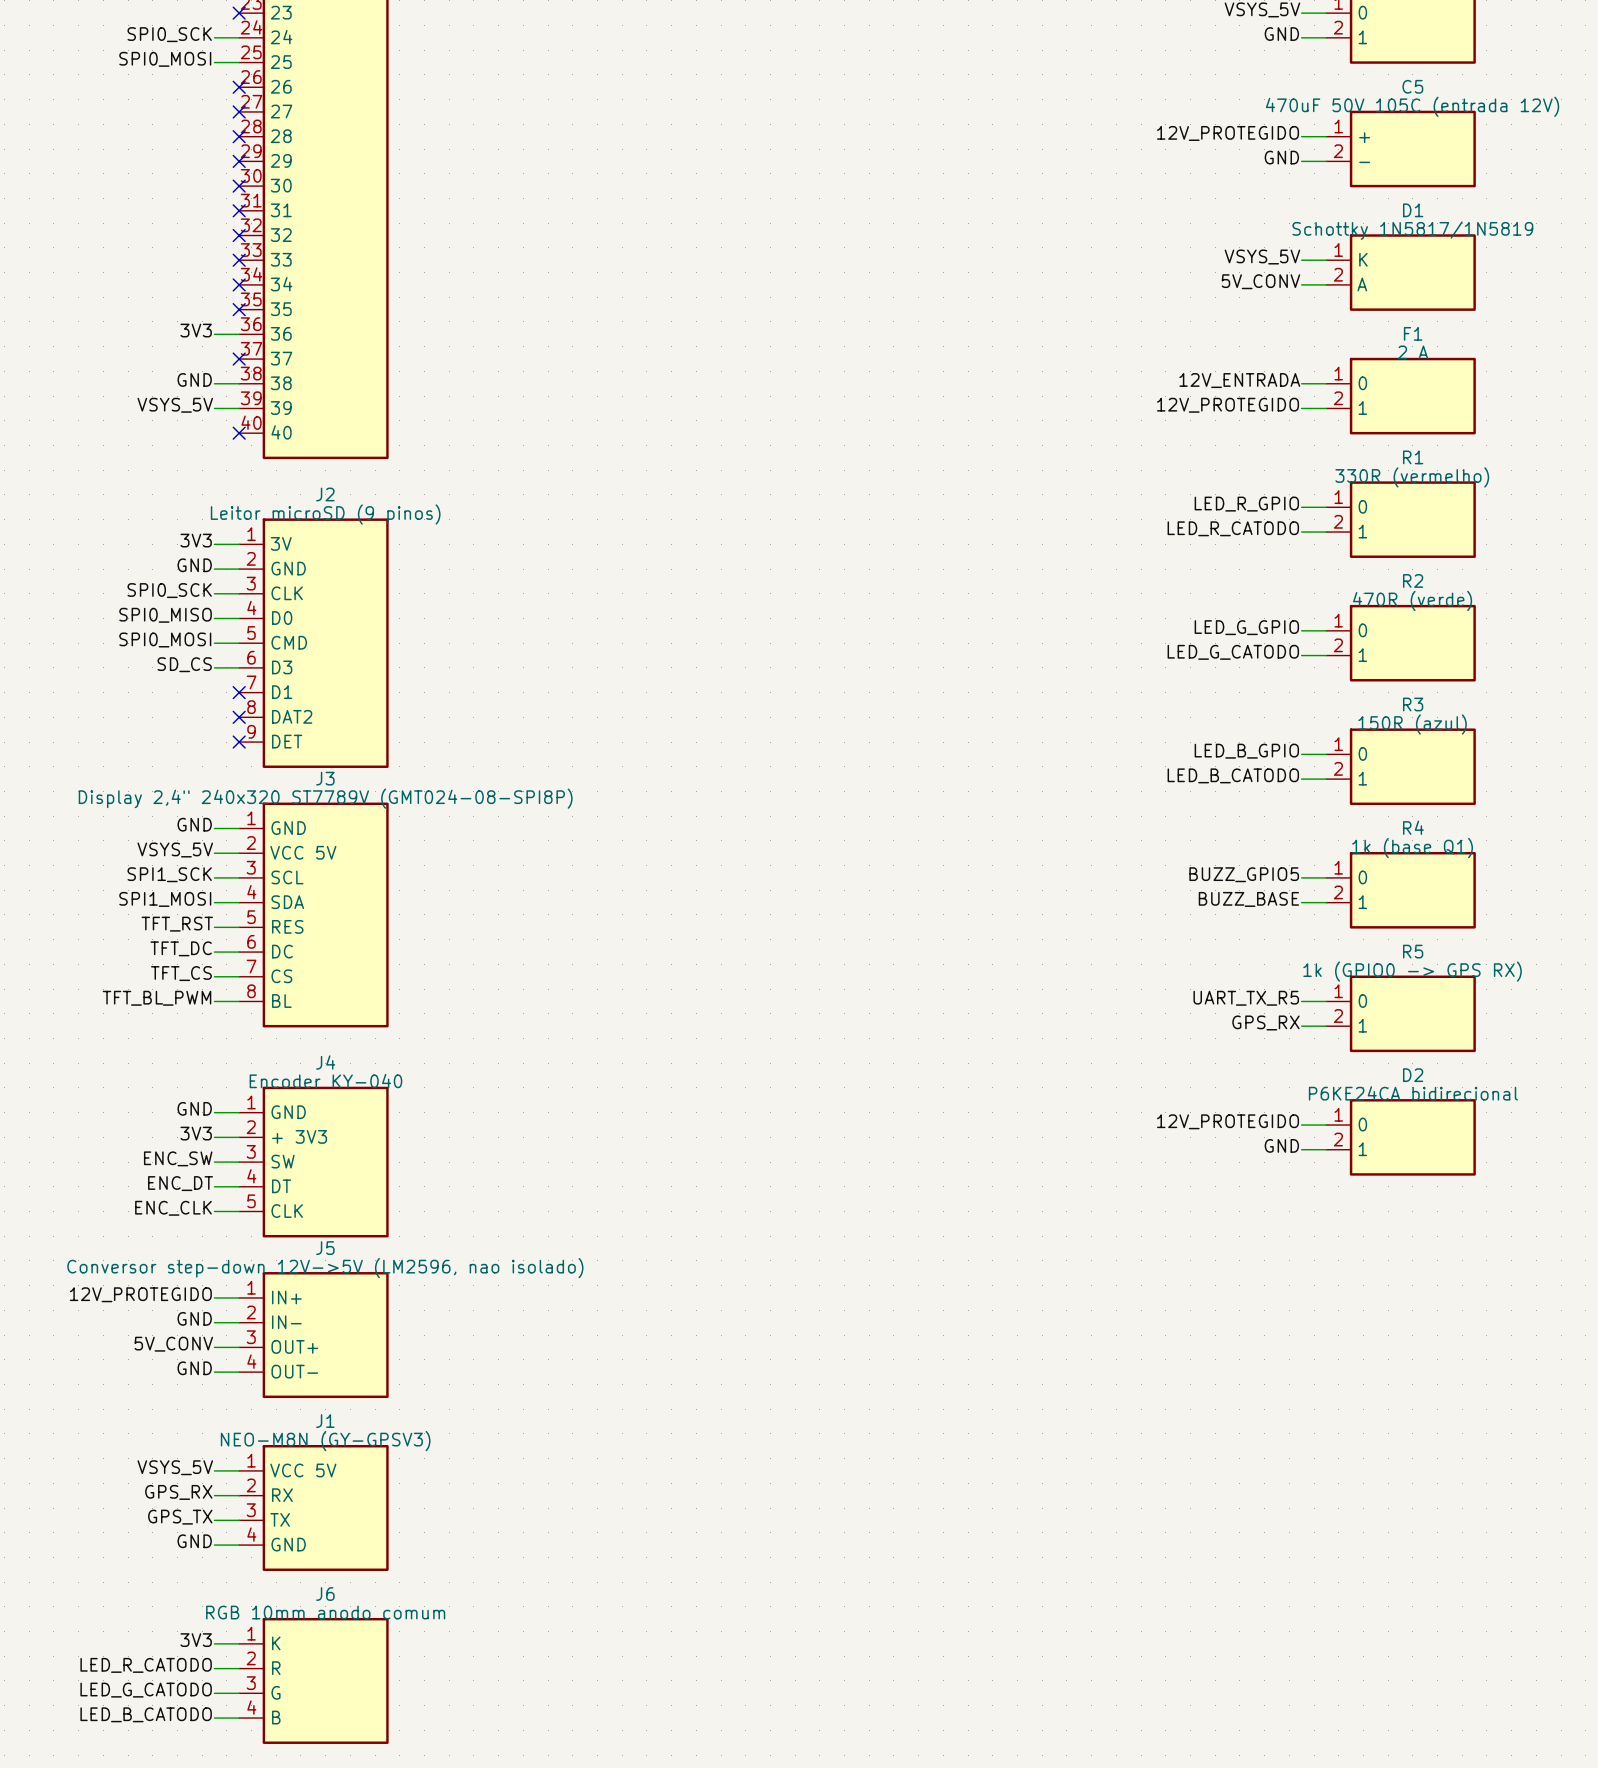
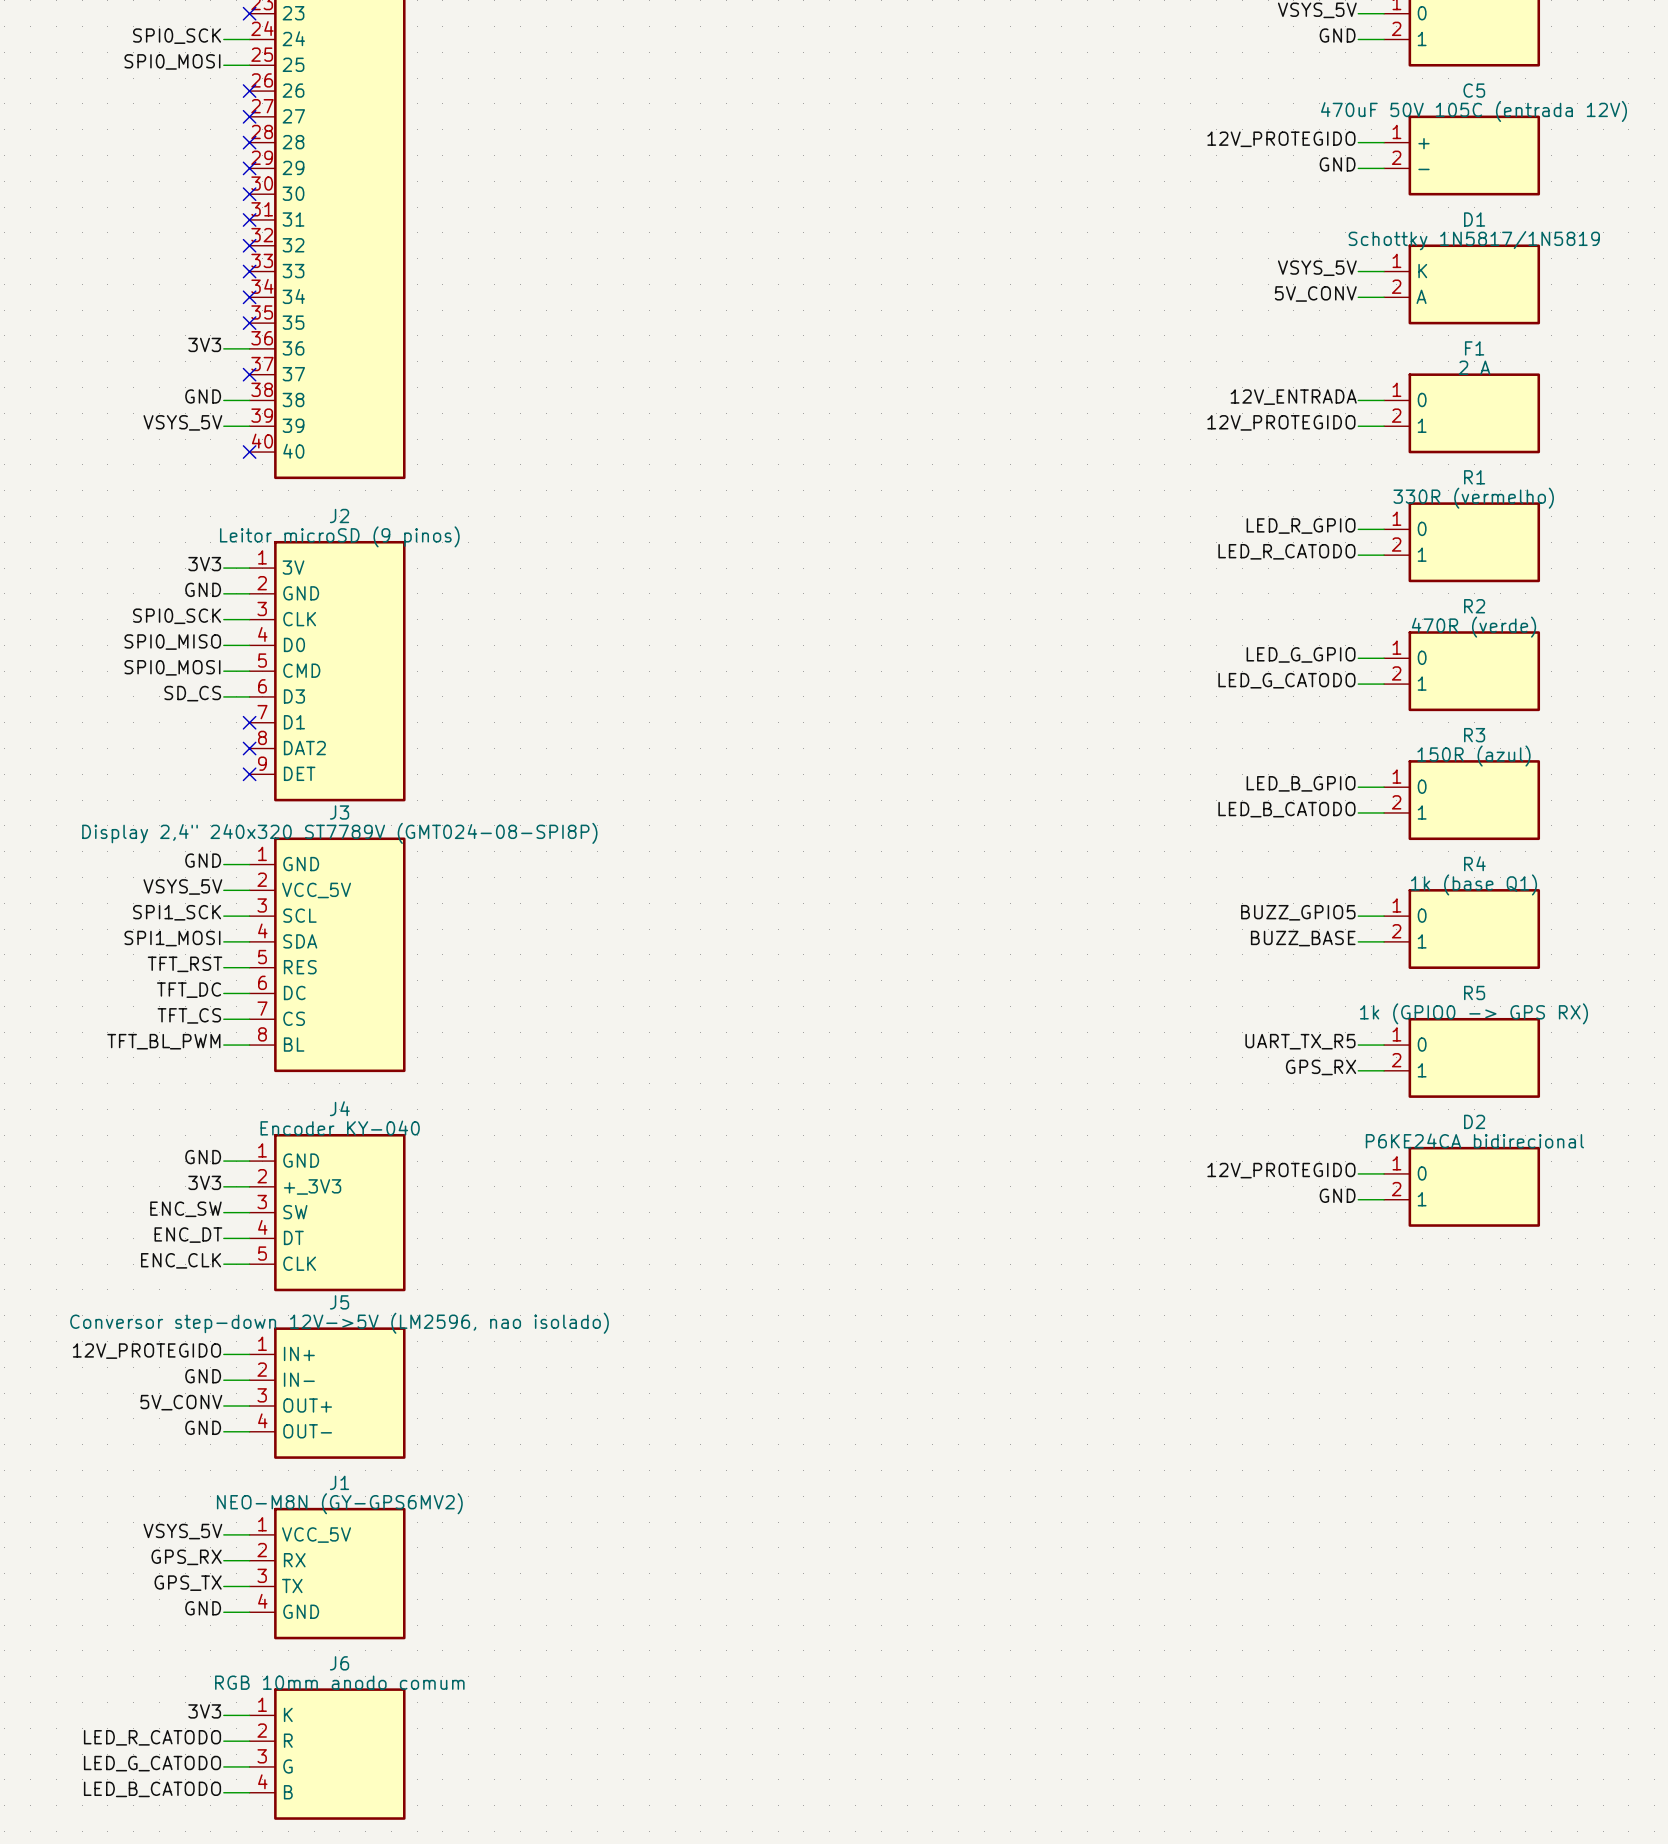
J3 pin name: VCC 5V (303, 852) -> VCC_5V (316, 890)
J4 pin name: + 3V3 (299, 1136) -> +_3V3 (312, 1186)
J1 value: NEO-M8N (GY-GPSV3) (325, 1441) -> NEO-M8N (GY-GPS6MV2) (339, 1503)
J1 pin name: VCC 5V (303, 1470) -> VCC_5V (316, 1535)

